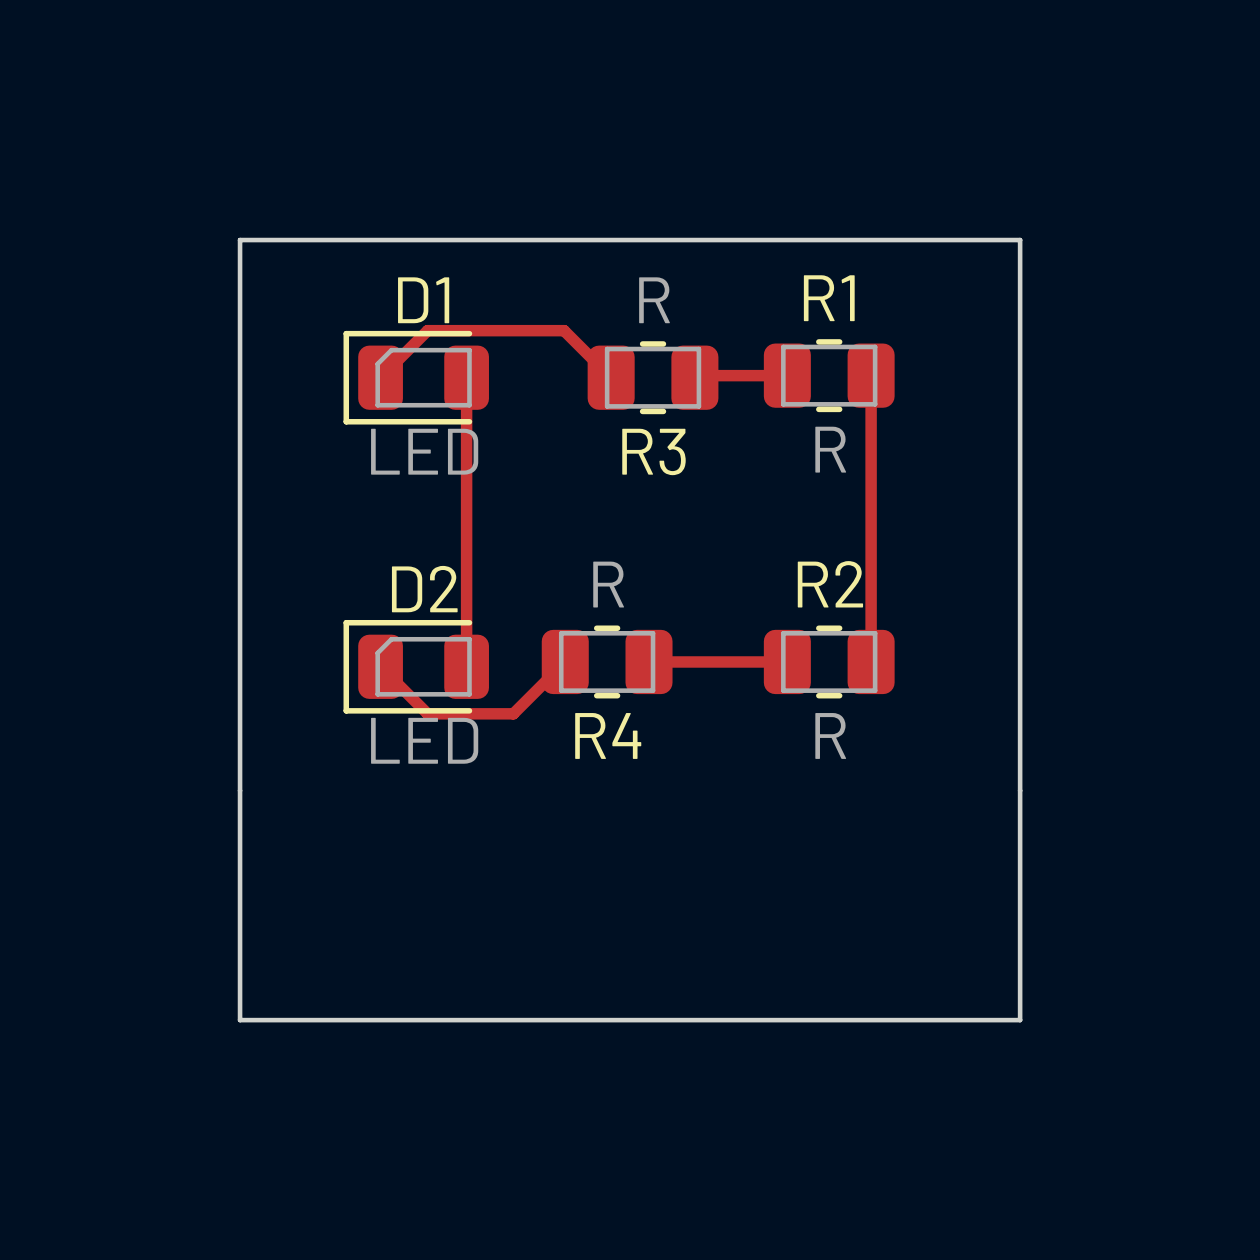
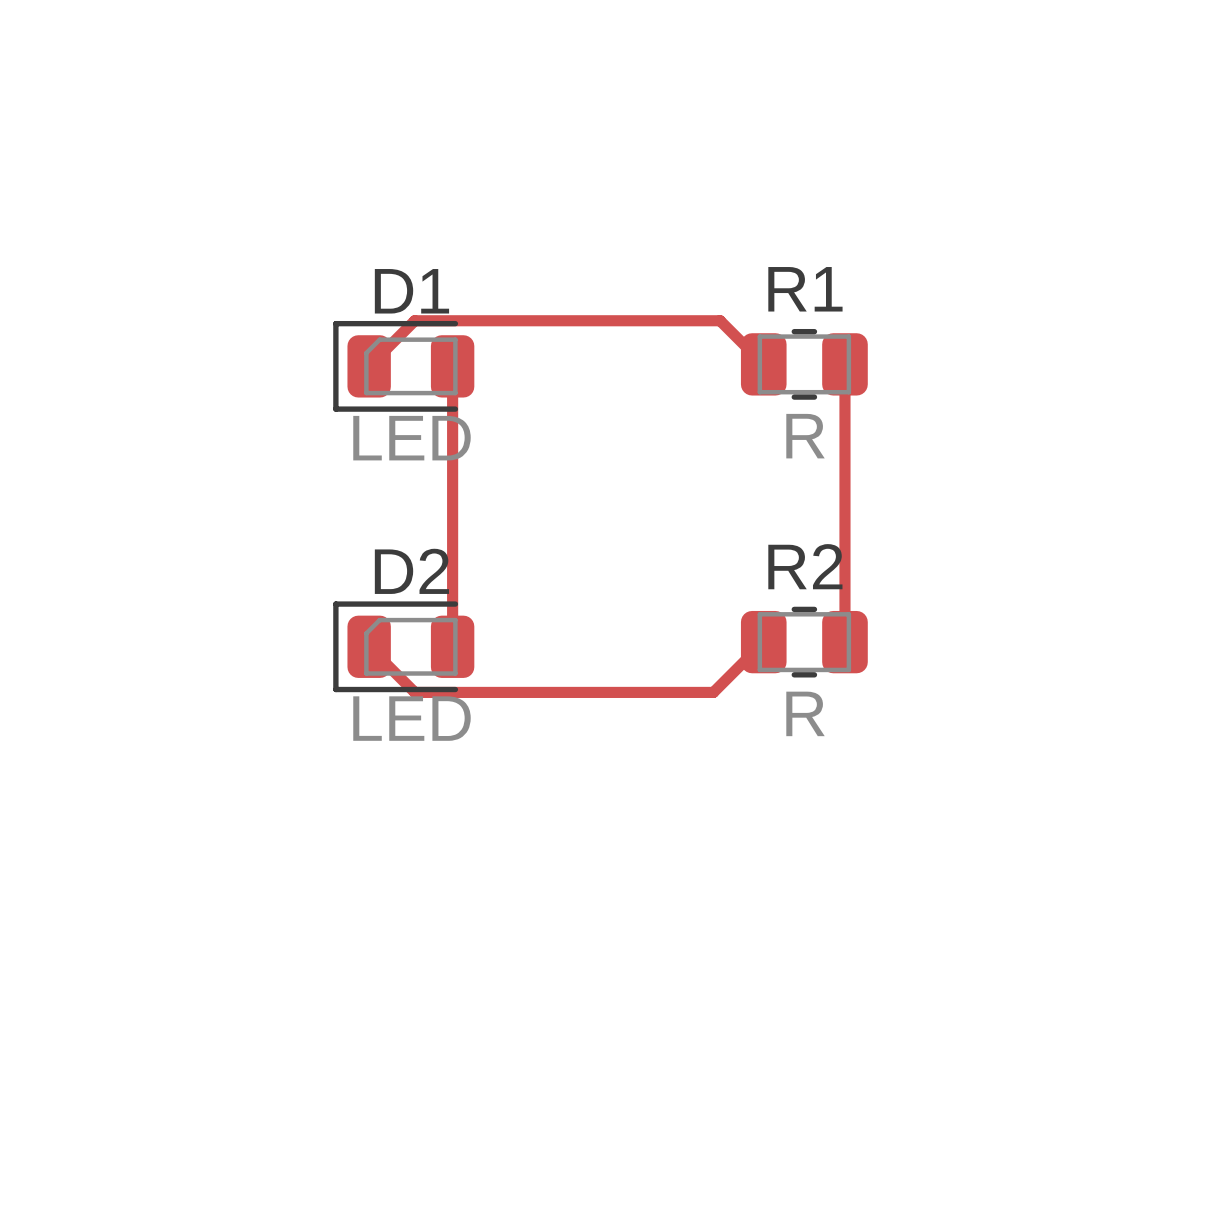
board edge: (240, 240) (240, 1020) (1020, 1020) (1020, 240) (240, 240) -> none
track: (564, 330) (611, 377) -> none
track: (787, 375) (696, 375) (694, 377) -> (763, 364) (720, 320) (547, 320)
R3: R (653, 377) -> none
track: (565, 661) (513, 713) -> none
R4: R (607, 661) -> none
track: (649, 661) (787, 661) -> (498, 692) (713, 692) (763, 642)

